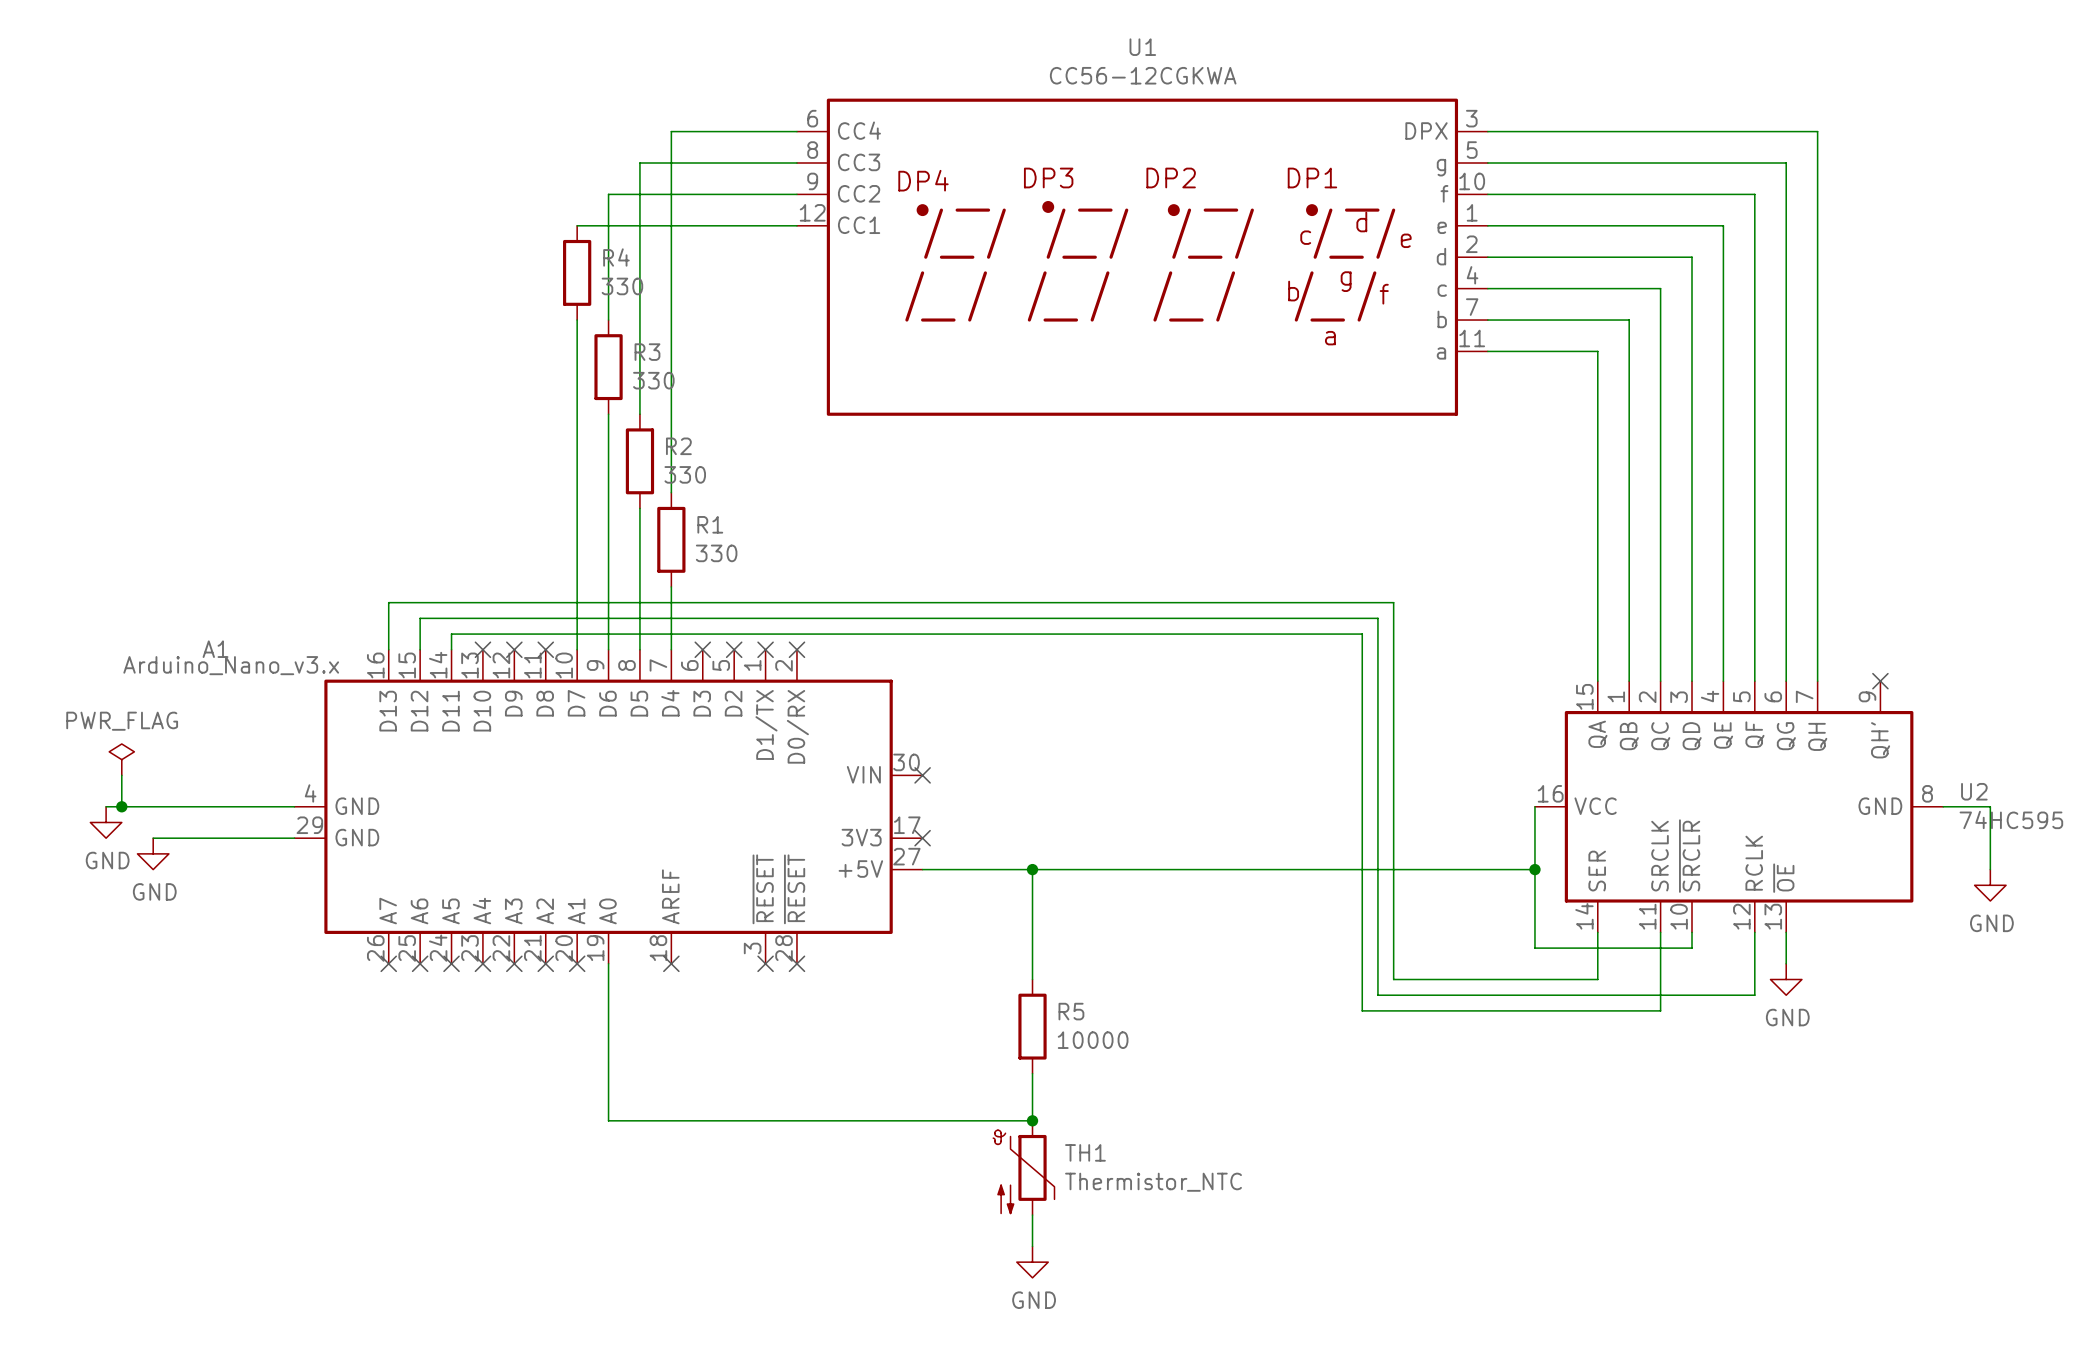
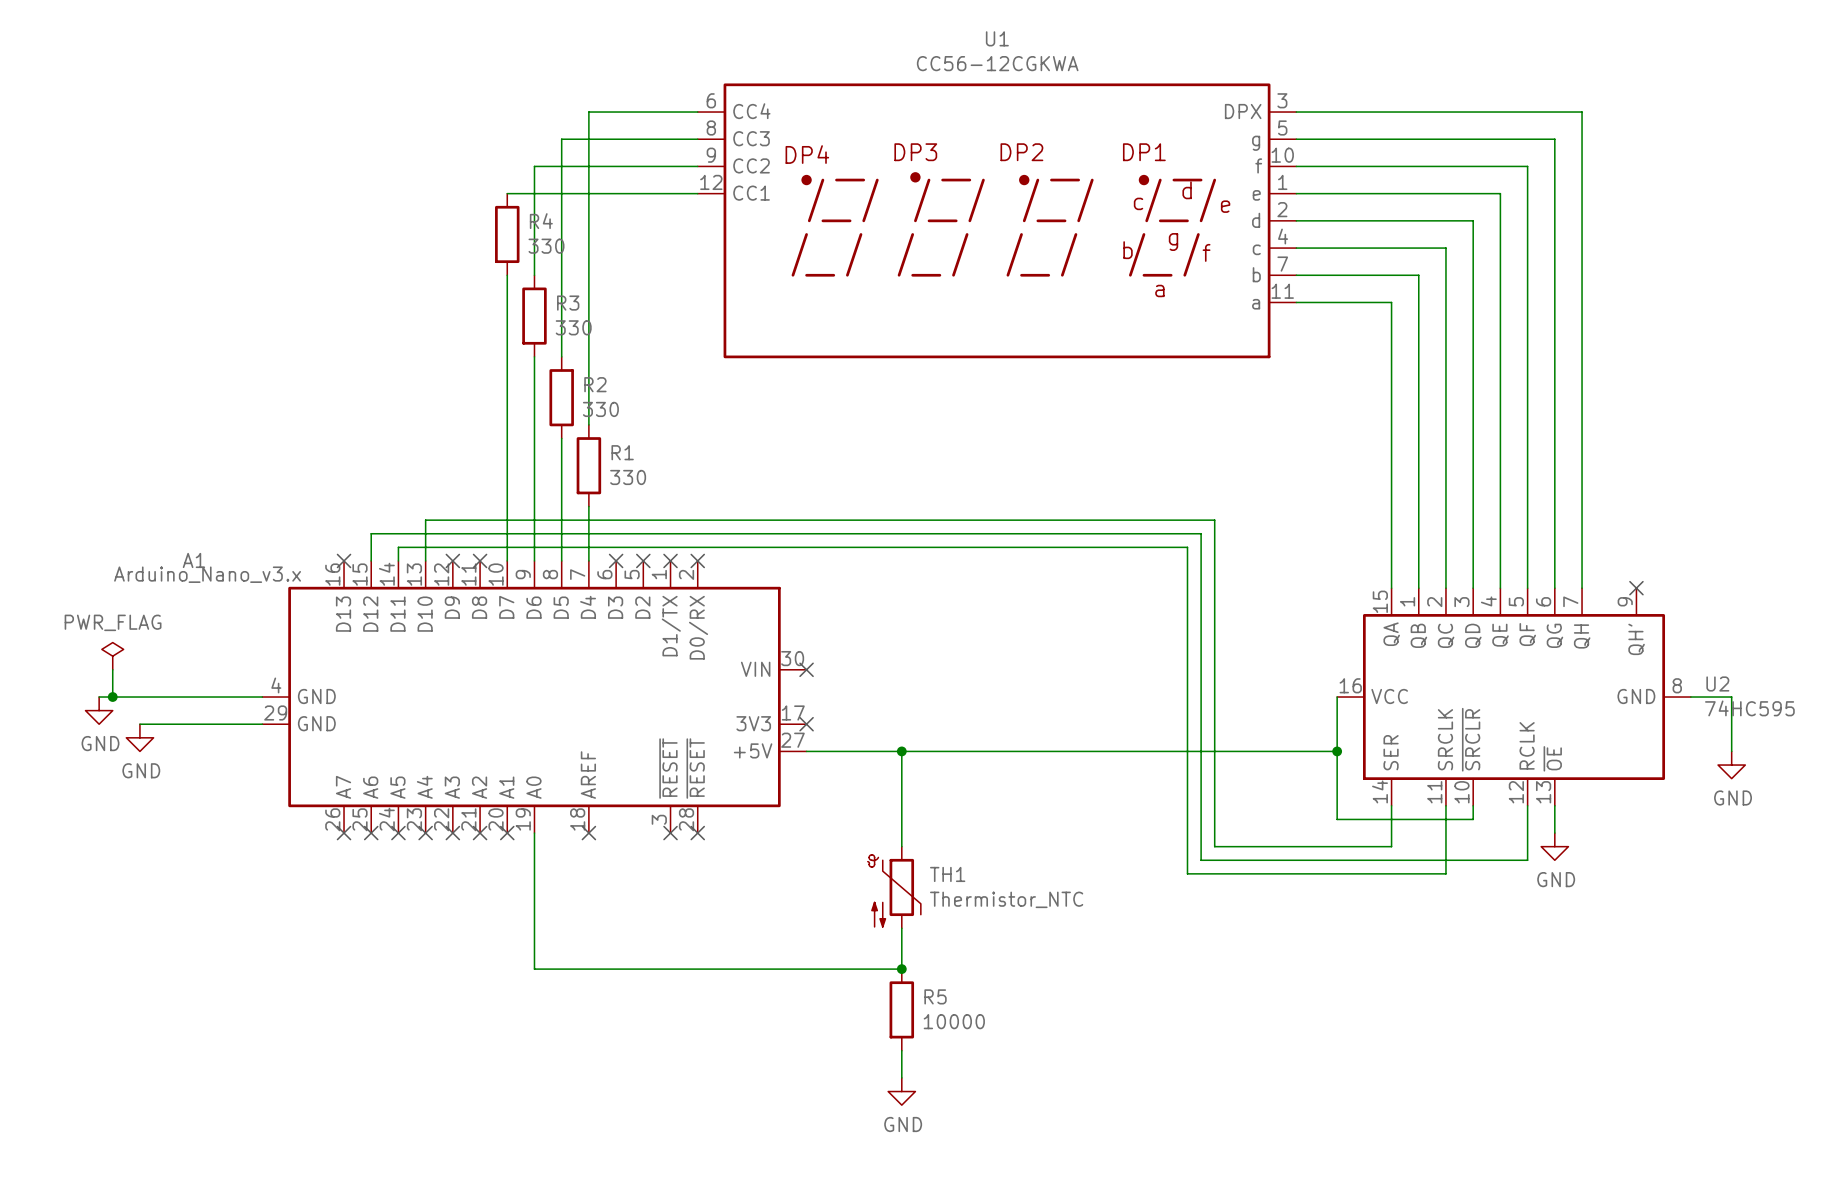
wire: (482, 602) (388, 602) (388, 649) -> (425, 520) (425, 560)
no-connect mark: none -> (344, 560)
no-connect mark: (482, 649) -> none
R5 position: (1032, 1026) -> (901, 1009)
TH1 position: (1023, 1167) -> (894, 887)

